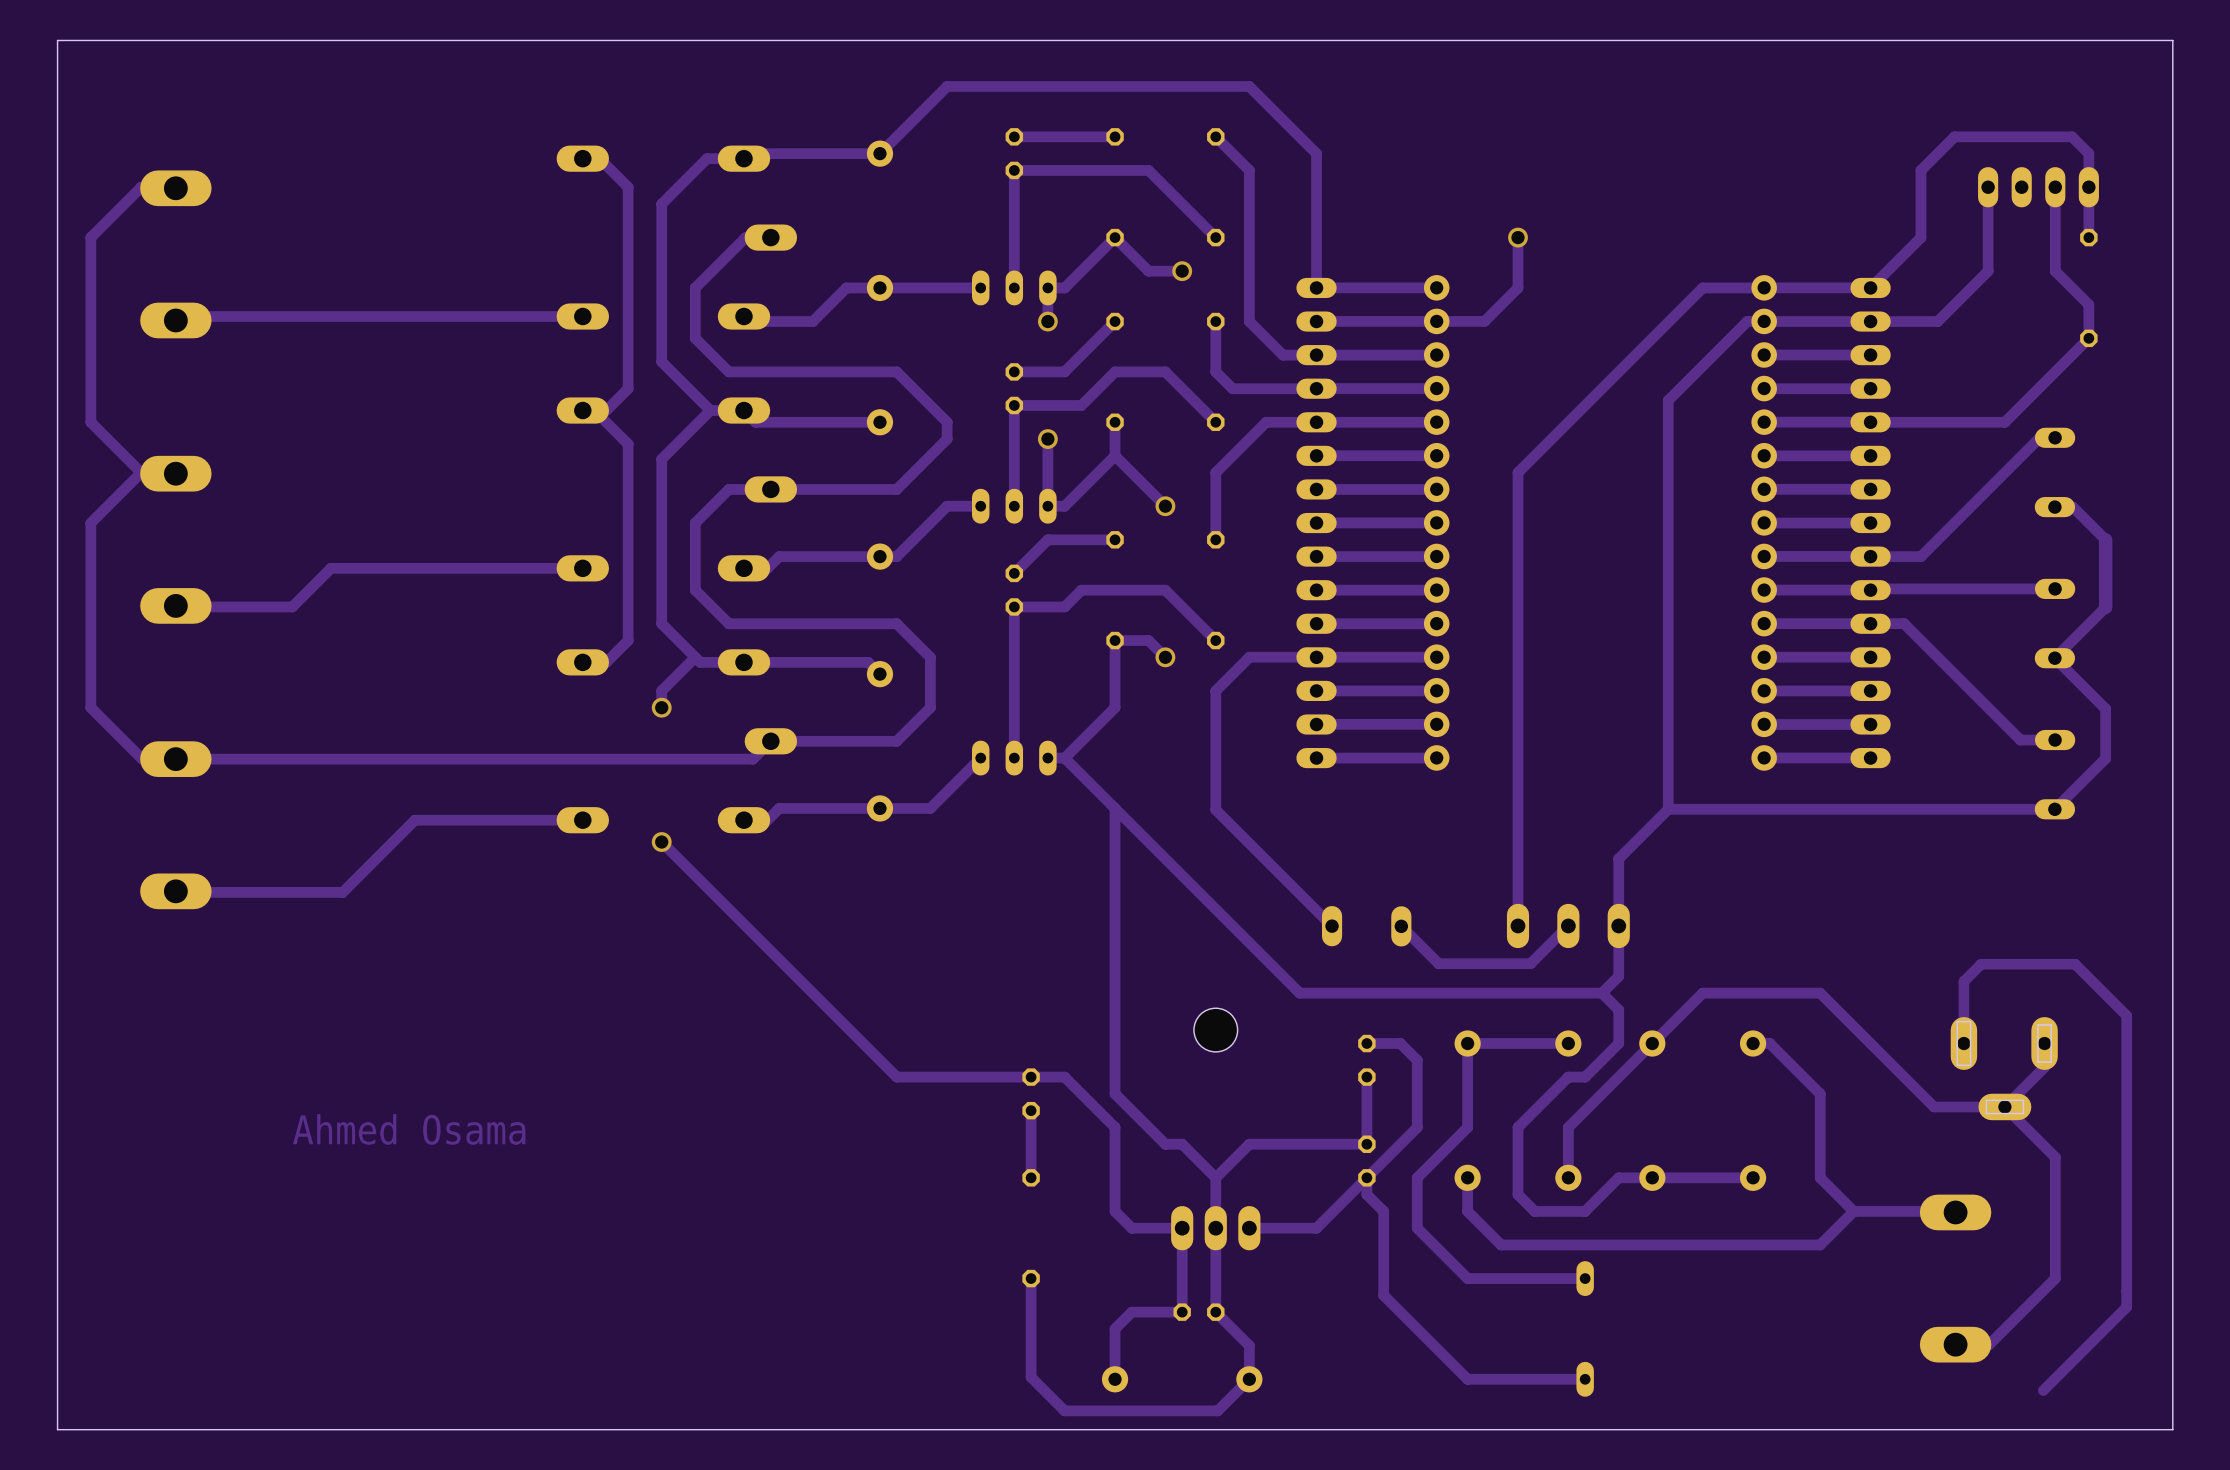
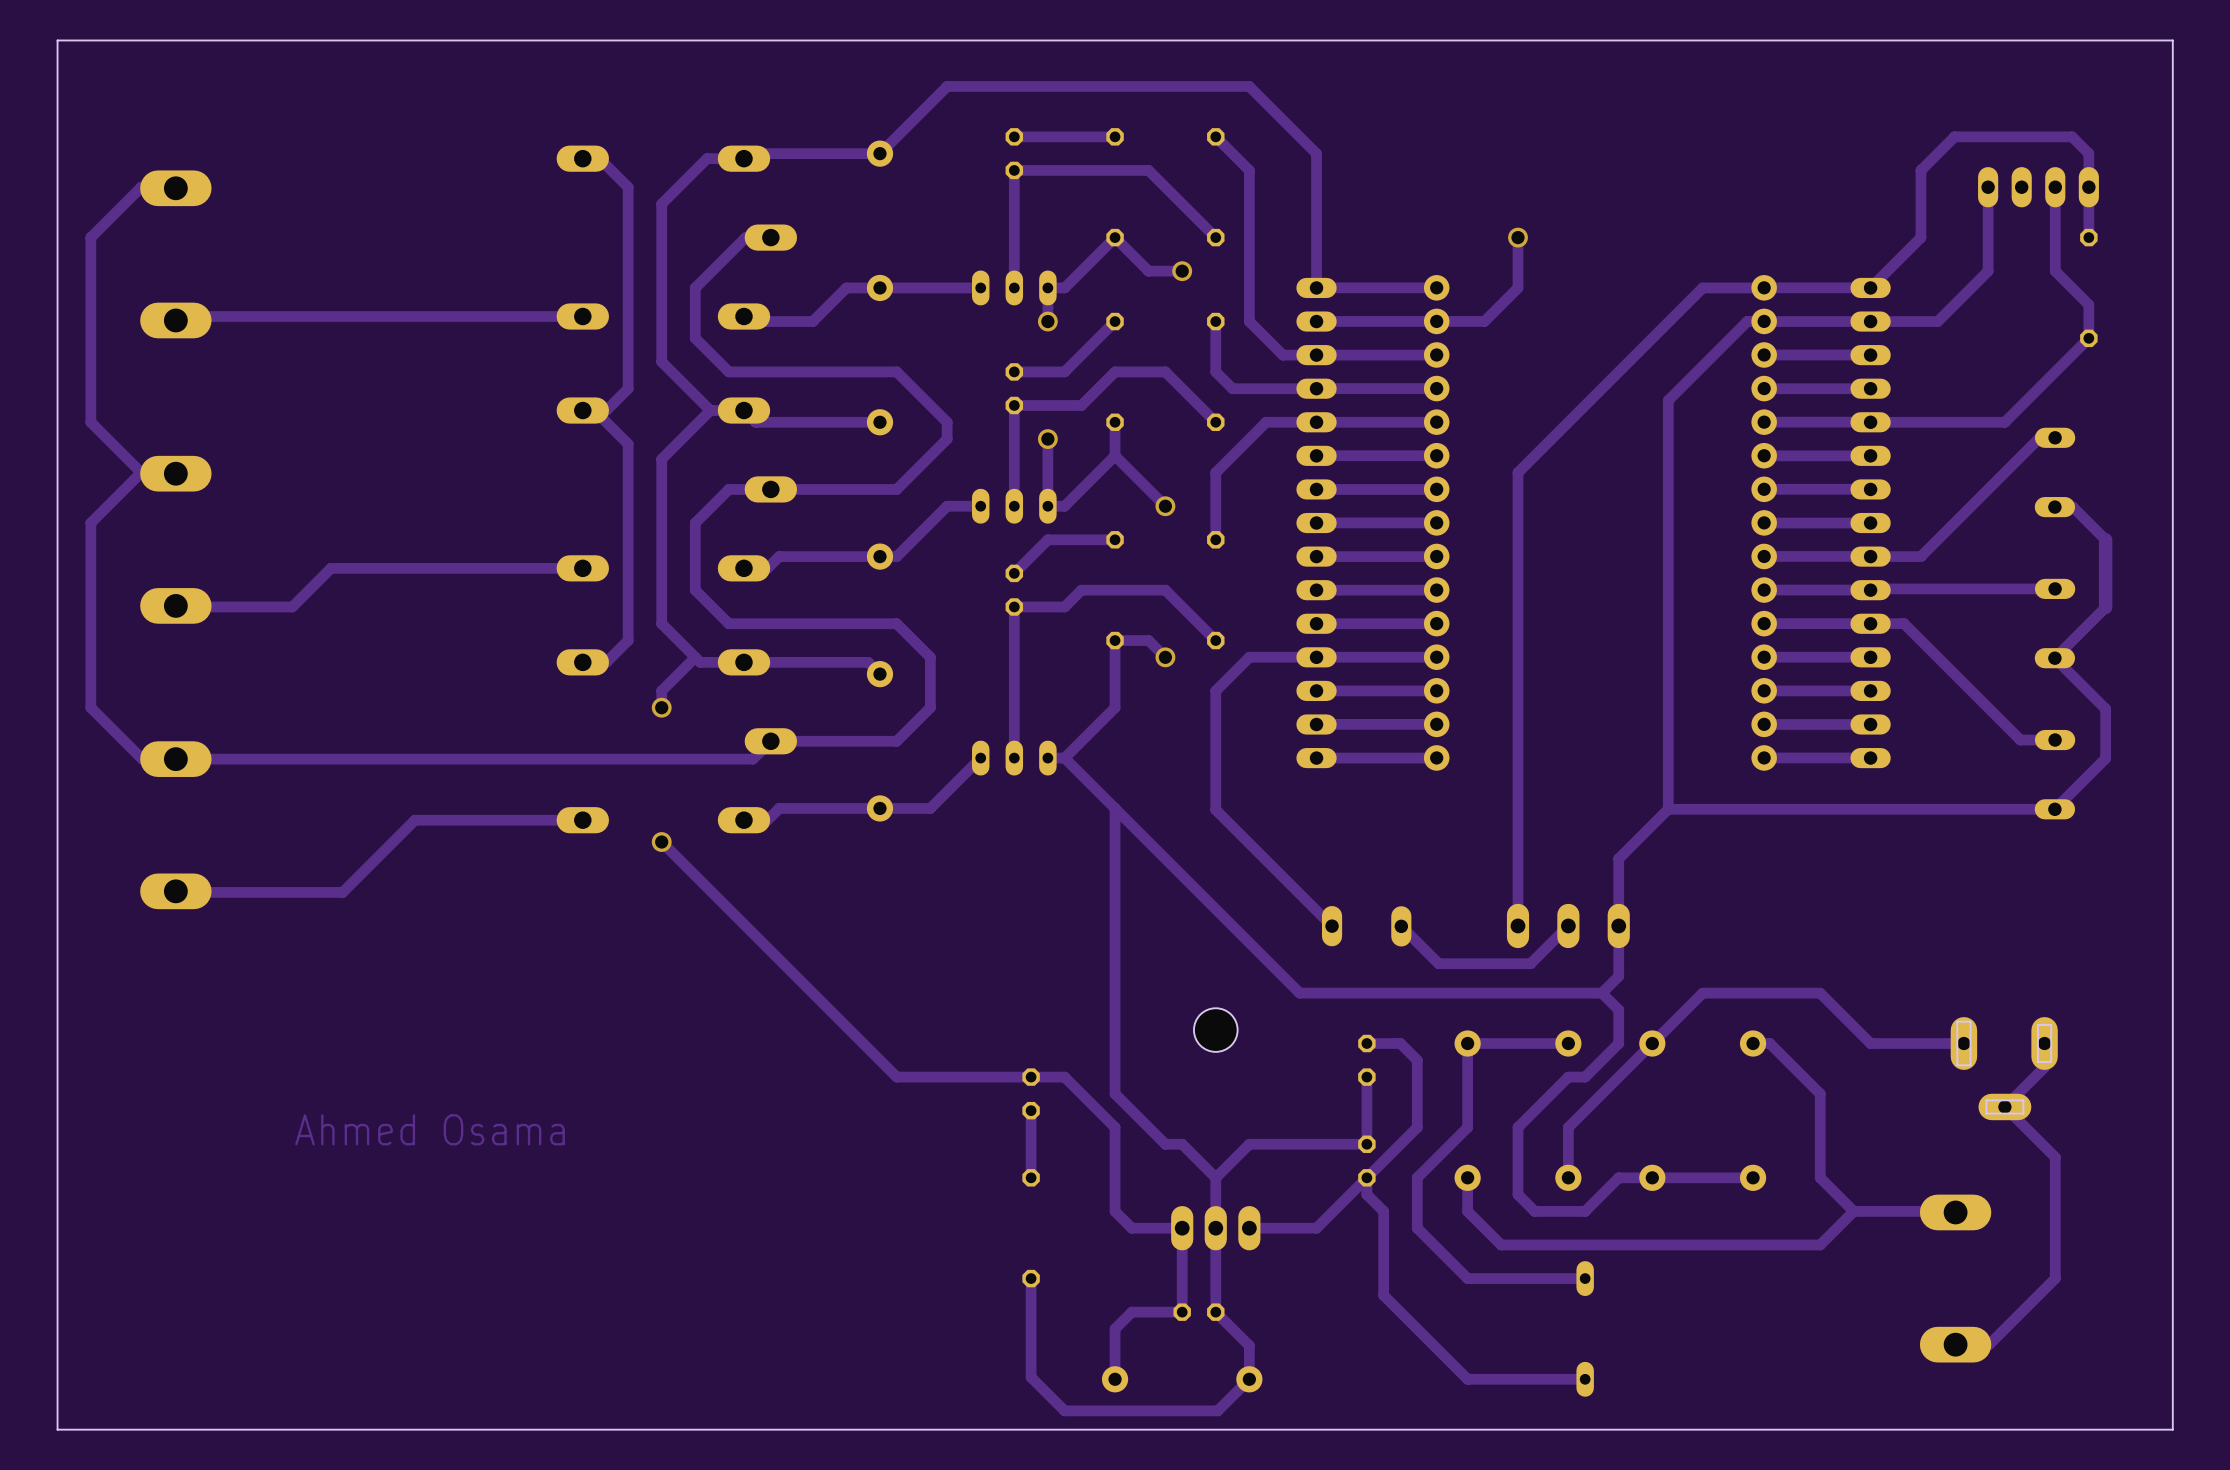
track: (1870, 1043) (1934, 1106) (2004, 1106) -> (1870, 1043) (1963, 1043)
track: (1963, 1043) (1963, 981) (1981, 964) (2075, 964) (2126, 1015) (2126, 1307) (2043, 1390) -> none

